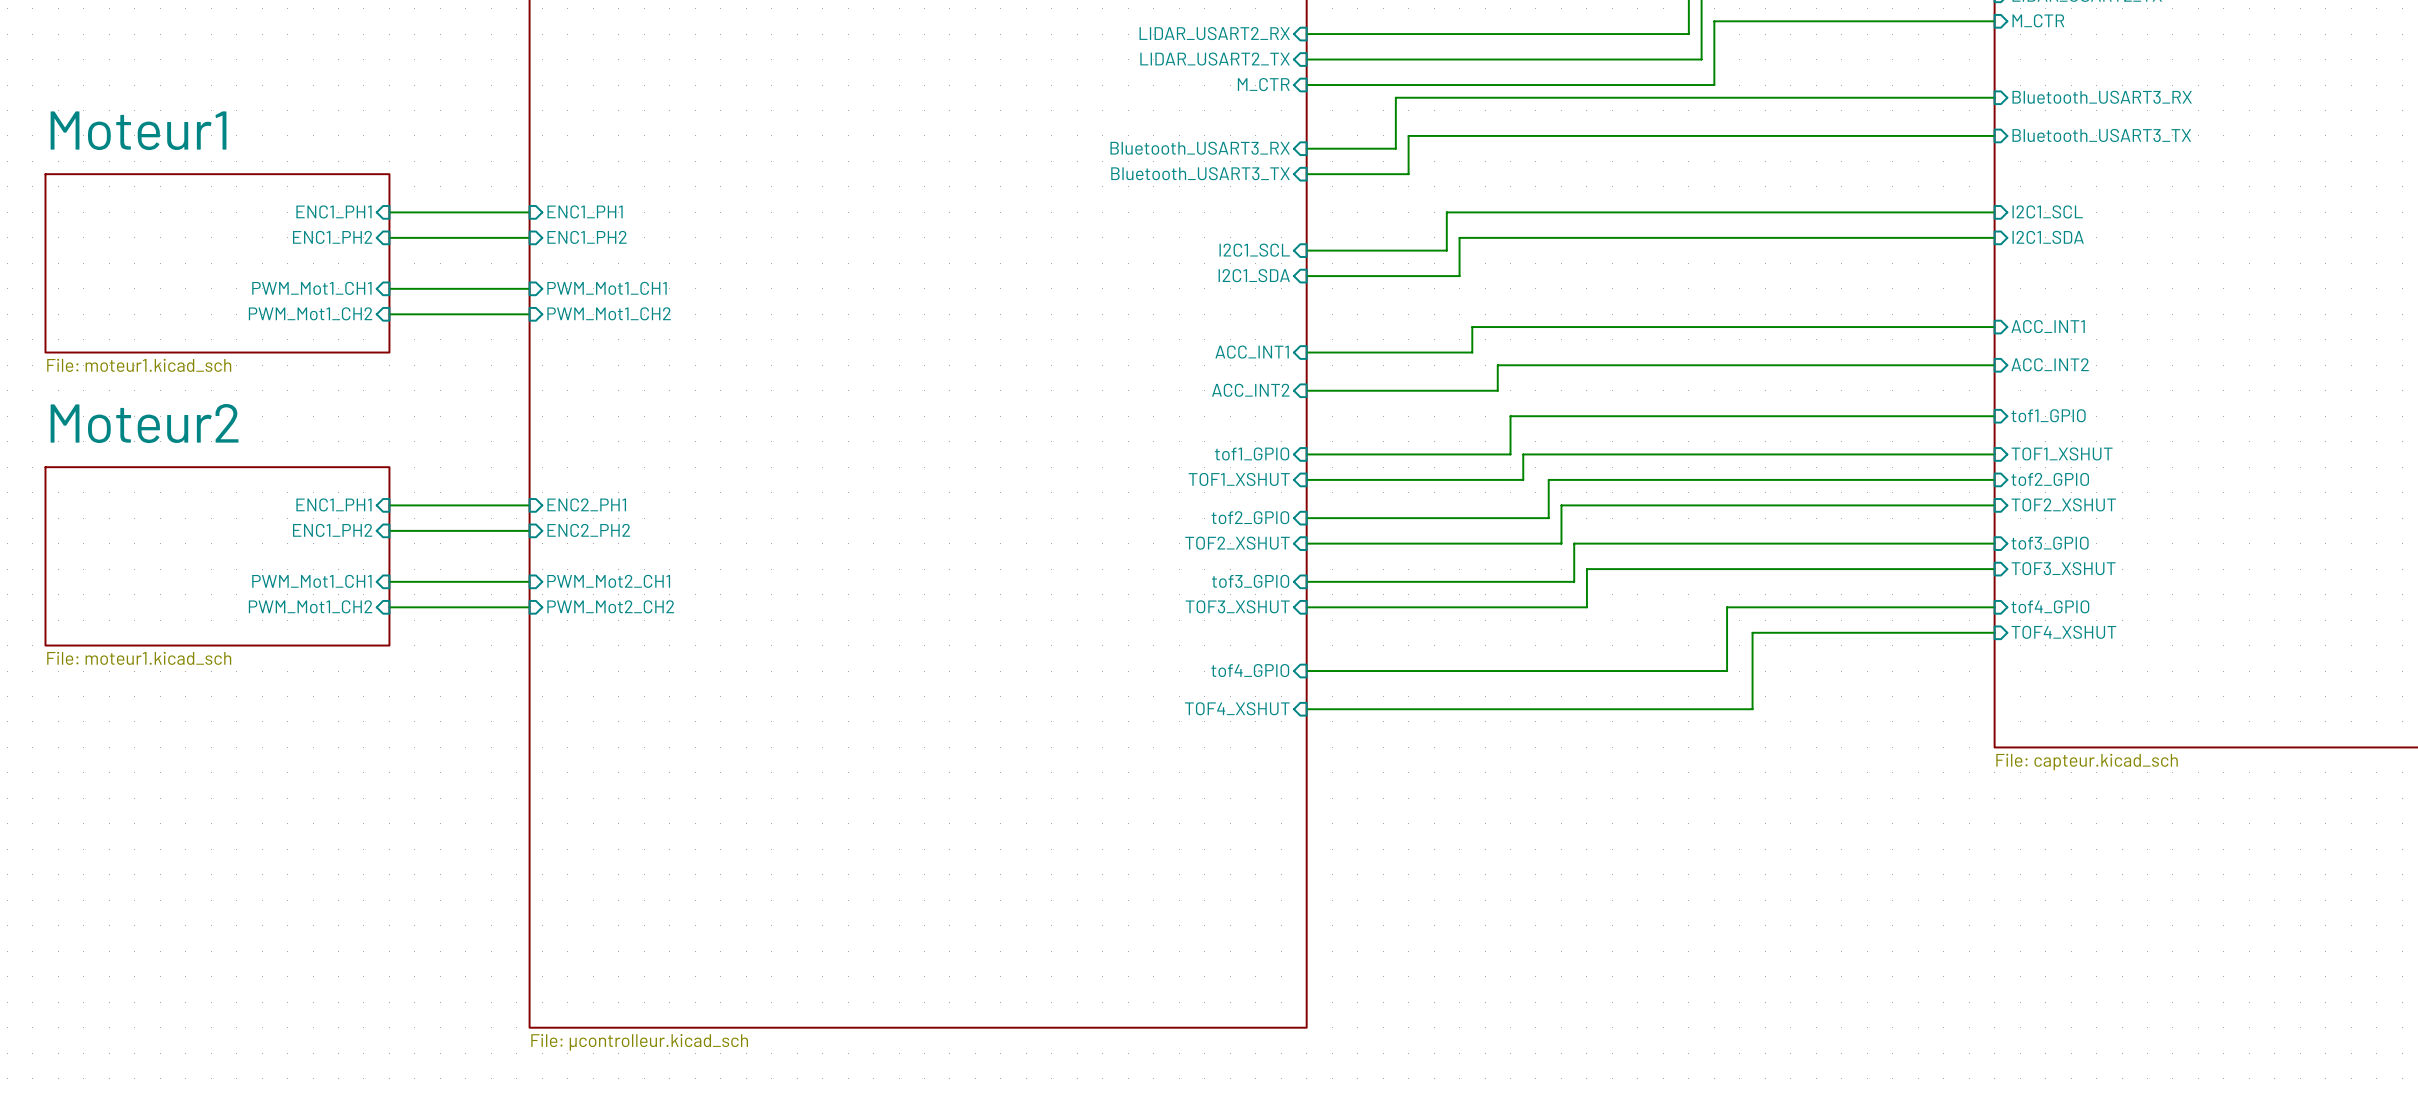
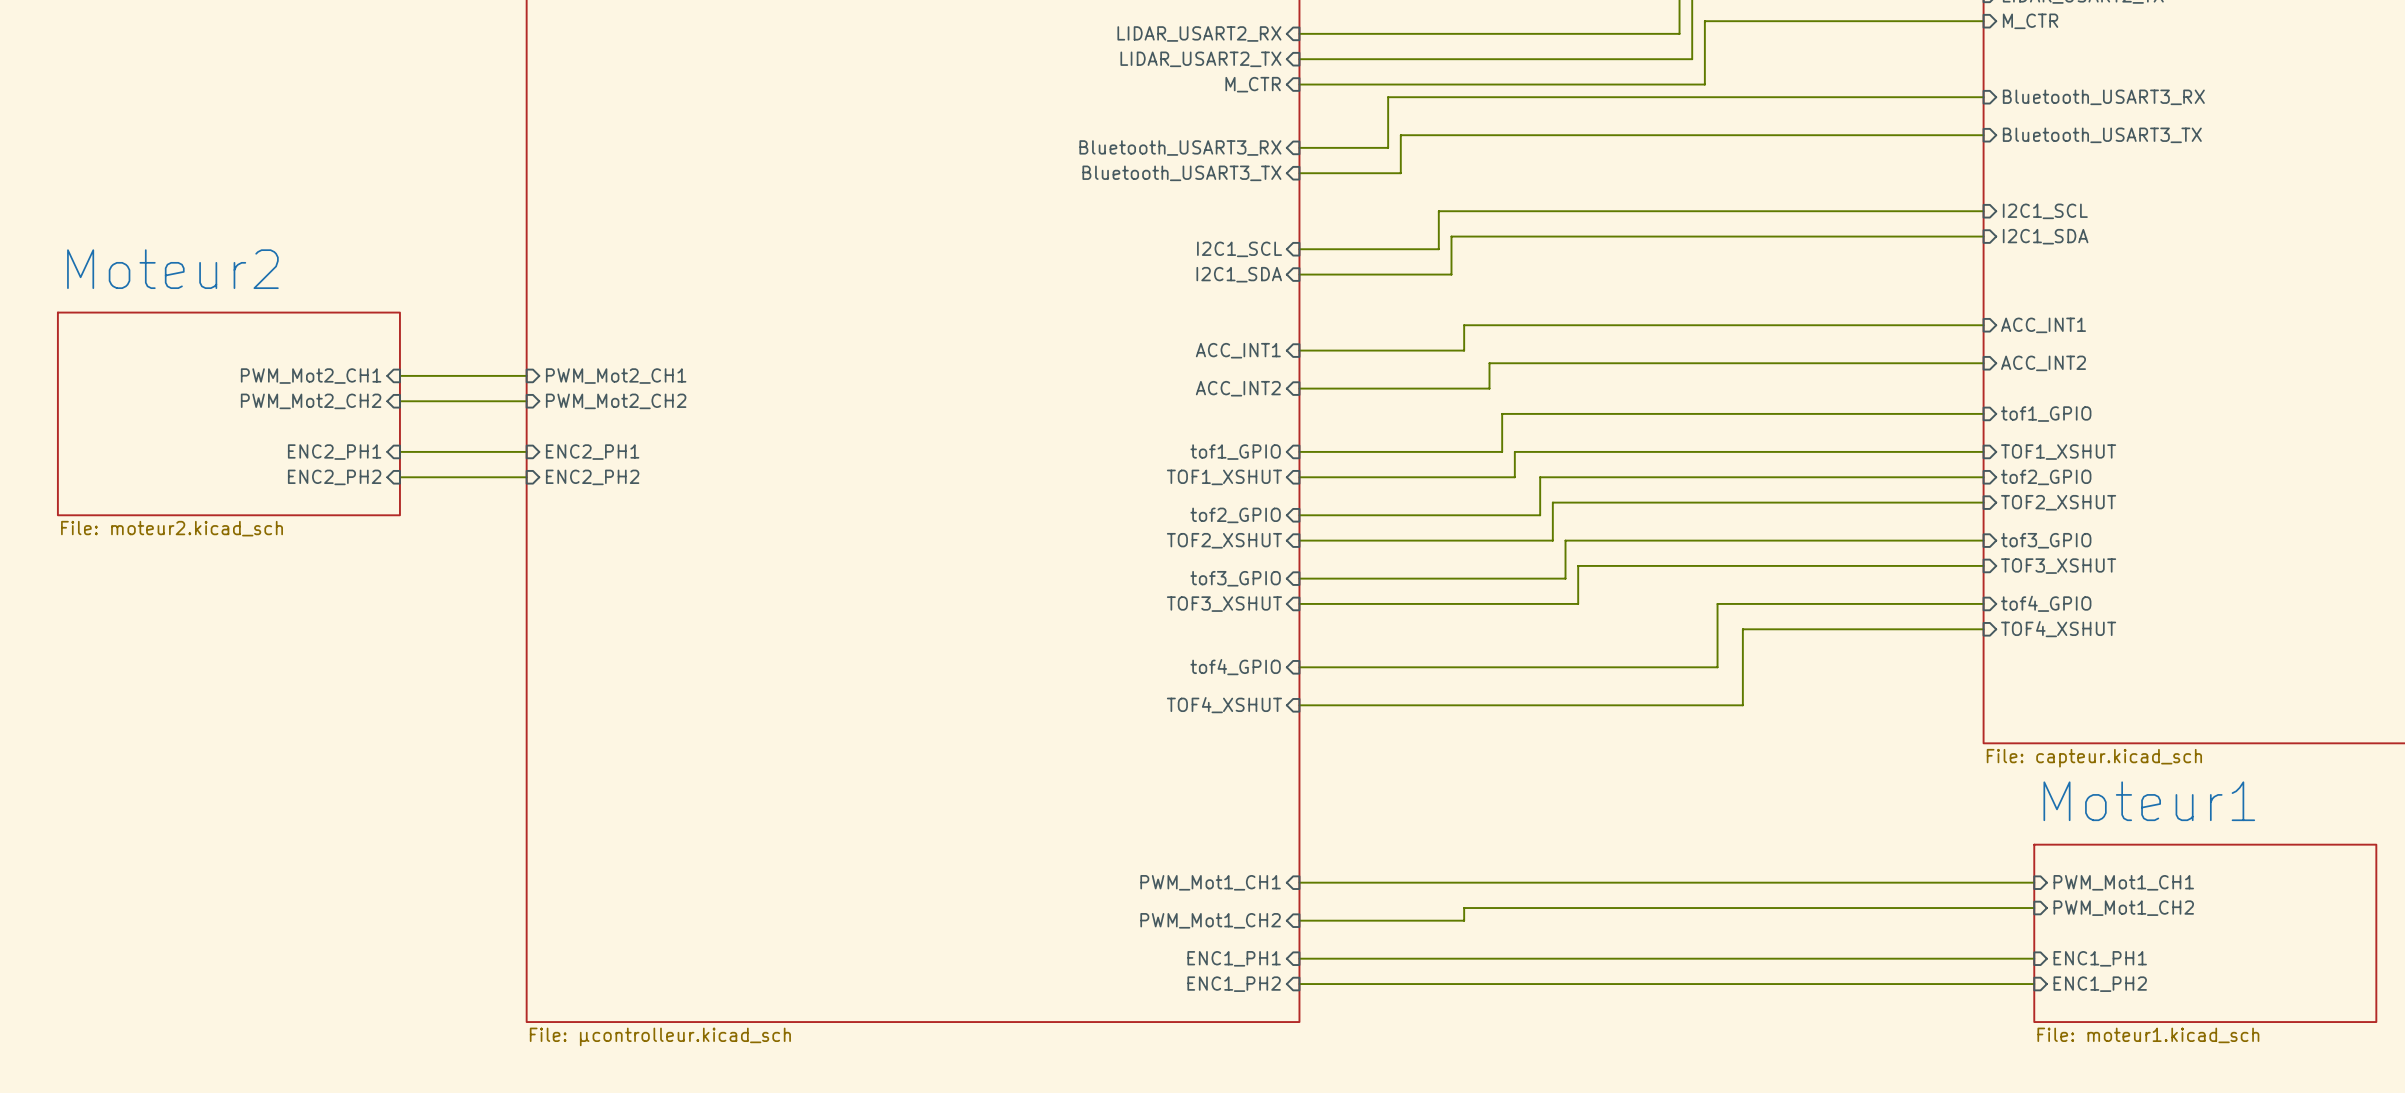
sheet pin: ENC1_PH1 (333, 211) -> none
sheet pin: ENC1_PH1 (585, 211) -> none
wire: (389, 212) (529, 212) -> none
sheet pin: ENC1_PH2 (332, 237) -> none
wire: (389, 237) (529, 237) -> none
sheet pin: ENC1_PH2 (587, 237) -> none
sheet Moteur1 position: (217, 263) -> (2205, 933)
sheet pin: PWM_Mot1_CH1 (311, 288) -> none
wire: (389, 288) (529, 288) -> none
sheet pin: PWM_Mot1_CH1 (607, 288) -> none
sheet pin: PWM_Mot1_CH2 (310, 313) -> none
sheet pin: PWM_Mot1_CH2 (609, 313) -> none
wire: (389, 314) (529, 314) -> none
sheet pin: none -> PWM_Mot2_CH1 (311, 376)
sheet pin: none -> PWM_Mot2_CH1 (616, 376)
wire: none -> (399, 375) (526, 375)
sheet pin: none -> PWM_Mot2_CH2 (311, 401)
wire: none -> (399, 401) (526, 401)
sheet pin: none -> PWM_Mot2_CH2 (616, 401)
sheet pin: none -> ENC2_PH1 (334, 452)
wire: none -> (399, 451) (526, 451)
sheet Moteur2 shape: [44, 466, 391, 647] -> [57, 311, 401, 517]
wire: none -> (399, 477) (526, 477)
sheet pin: ENC1_PH1 (333, 504) -> ENC2_PH2 (334, 477)
sheet pin position: ENC2_PH1 (586, 504) -> ENC2_PH1 (592, 452)
wire: (389, 505) (529, 505) -> none
sheet pin: ENC1_PH2 (332, 530) -> none
wire: (389, 530) (529, 530) -> none
sheet pin position: ENC2_PH2 (588, 530) -> ENC2_PH2 (592, 477)
sheet pin: PWM_Mot1_CH1 (311, 581) -> none
wire: (389, 581) (529, 581) -> none
sheet pin: PWM_Mot2_CH1 (608, 581) -> none
sheet pin: PWM_Mot1_CH2 (310, 606) -> none
sheet pin: PWM_Mot2_CH2 (610, 606) -> none
wire: (389, 607) (529, 607) -> none
sheet Moteur2 value: File: moteur1.kicad_sch (139, 658) -> File: moteur2.kicad_sch (172, 528)
sheet pin: none -> PWM_Mot1_CH1 (1210, 882)
wire: none -> (1299, 882) (2034, 882)
sheet pin: none -> PWM_Mot1_CH1 (2123, 882)
sheet pin: none -> PWM_Mot1_CH2 (2123, 908)
wire: none -> (2034, 908) (1464, 908) (1464, 920) (1299, 920)
sheet pin: none -> PWM_Mot1_CH2 (1210, 920)
sheet pin: none -> ENC1_PH1 (1234, 958)
sheet pin: none -> ENC1_PH1 (2100, 958)
wire: none -> (1299, 958) (2034, 958)
sheet pin: none -> ENC1_PH2 (1234, 984)
wire: none -> (1299, 984) (2034, 984)
sheet pin: none -> ENC1_PH2 (2100, 984)

